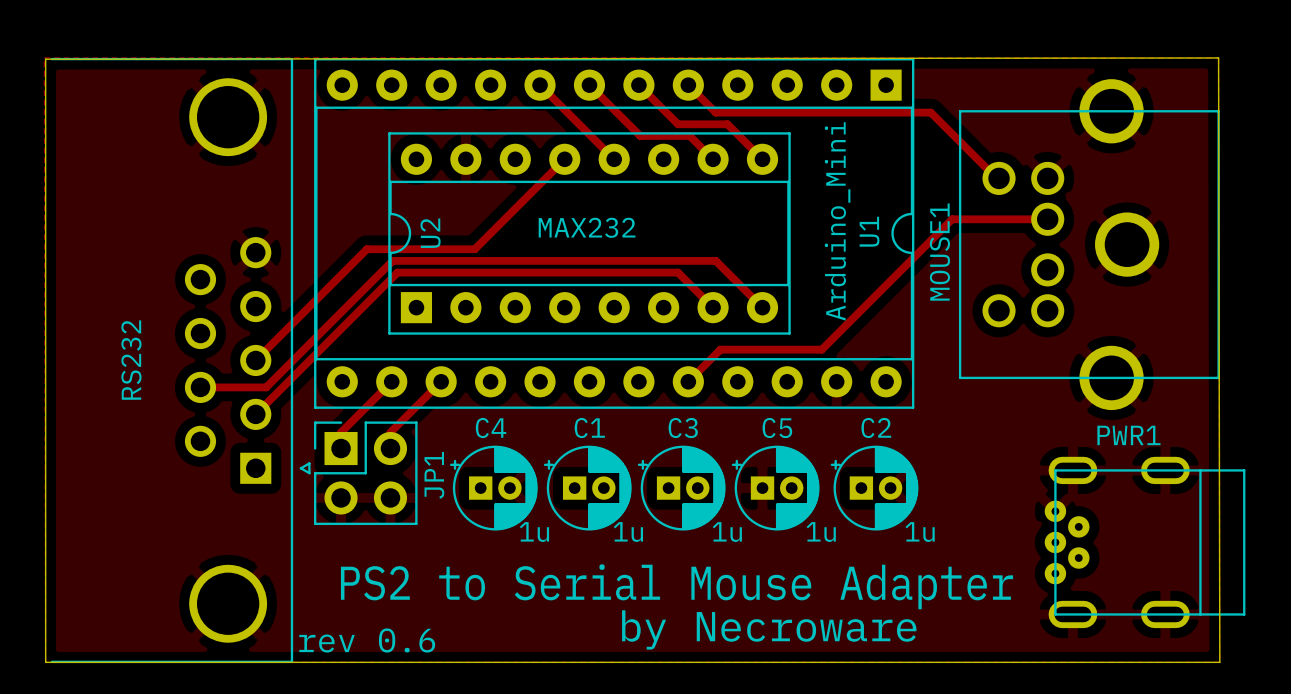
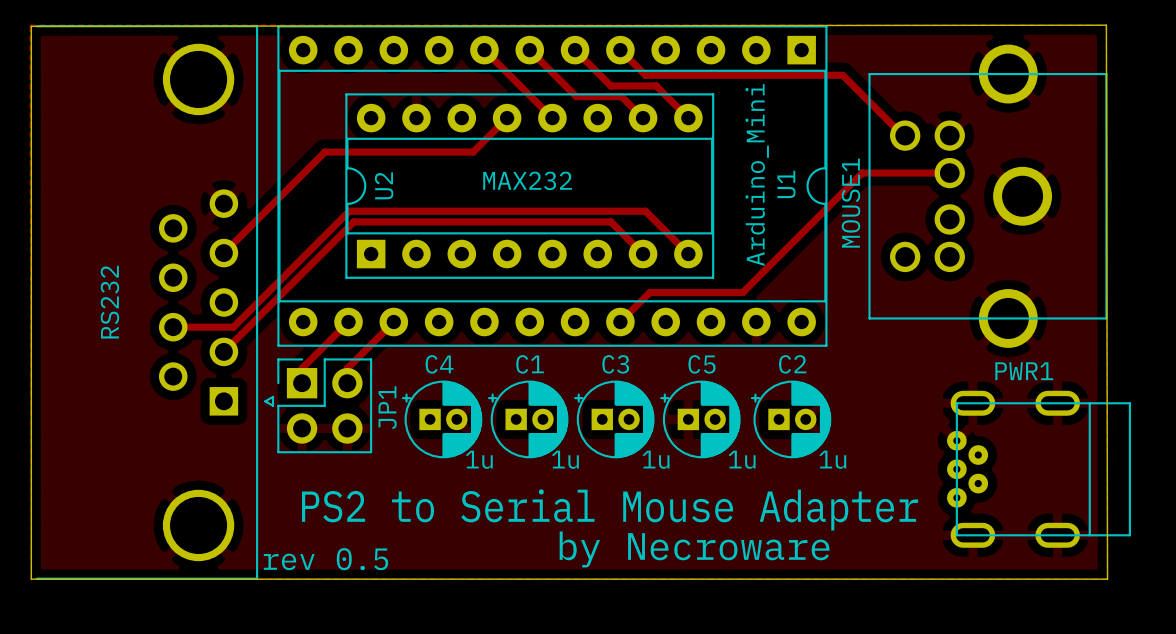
track: (527, 196) (474, 249) (367, 249) (255, 360) -> (473, 152) (324, 152) (223, 253)
text: rev 0.6 (367, 640) -> rev 0.5 (326, 559)

